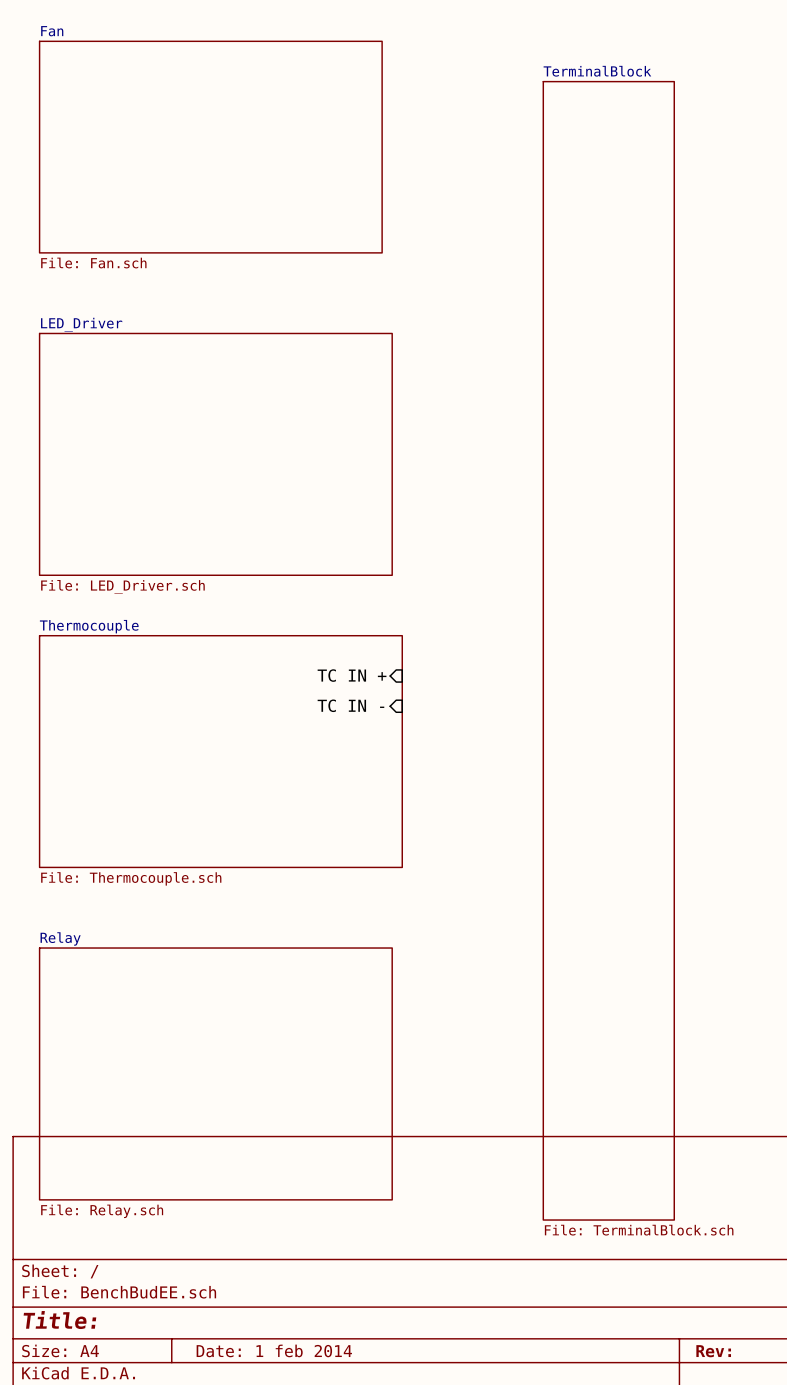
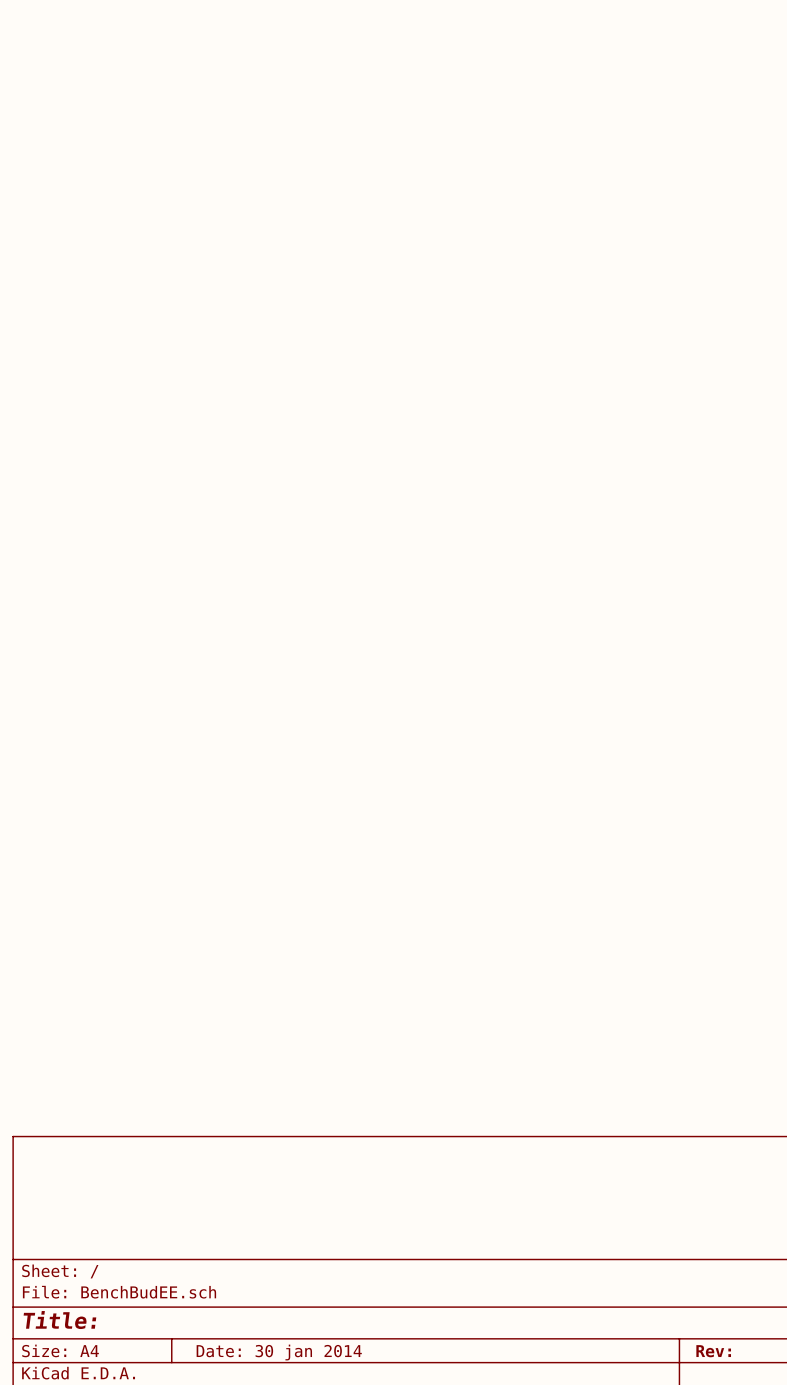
sheet Fan: File: Fan.sch (210, 147) -> none
sheet LED_Driver: File: LED_Driver.sch (215, 454) -> none
sheet TerminalBlock: File: TerminalBlock.sch (608, 650) -> none
sheet pin: TC IN + (352, 675) -> none
sheet pin: TC IN - (350, 705) -> none
sheet Thermocouple: File: Thermocouple.sch (220, 751) -> none
sheet Relay: File: Relay.sch (215, 1073) -> none
title block: Date: 1 feb 2014 (274, 1350) -> Date: 30 jan 2014 (279, 1352)

